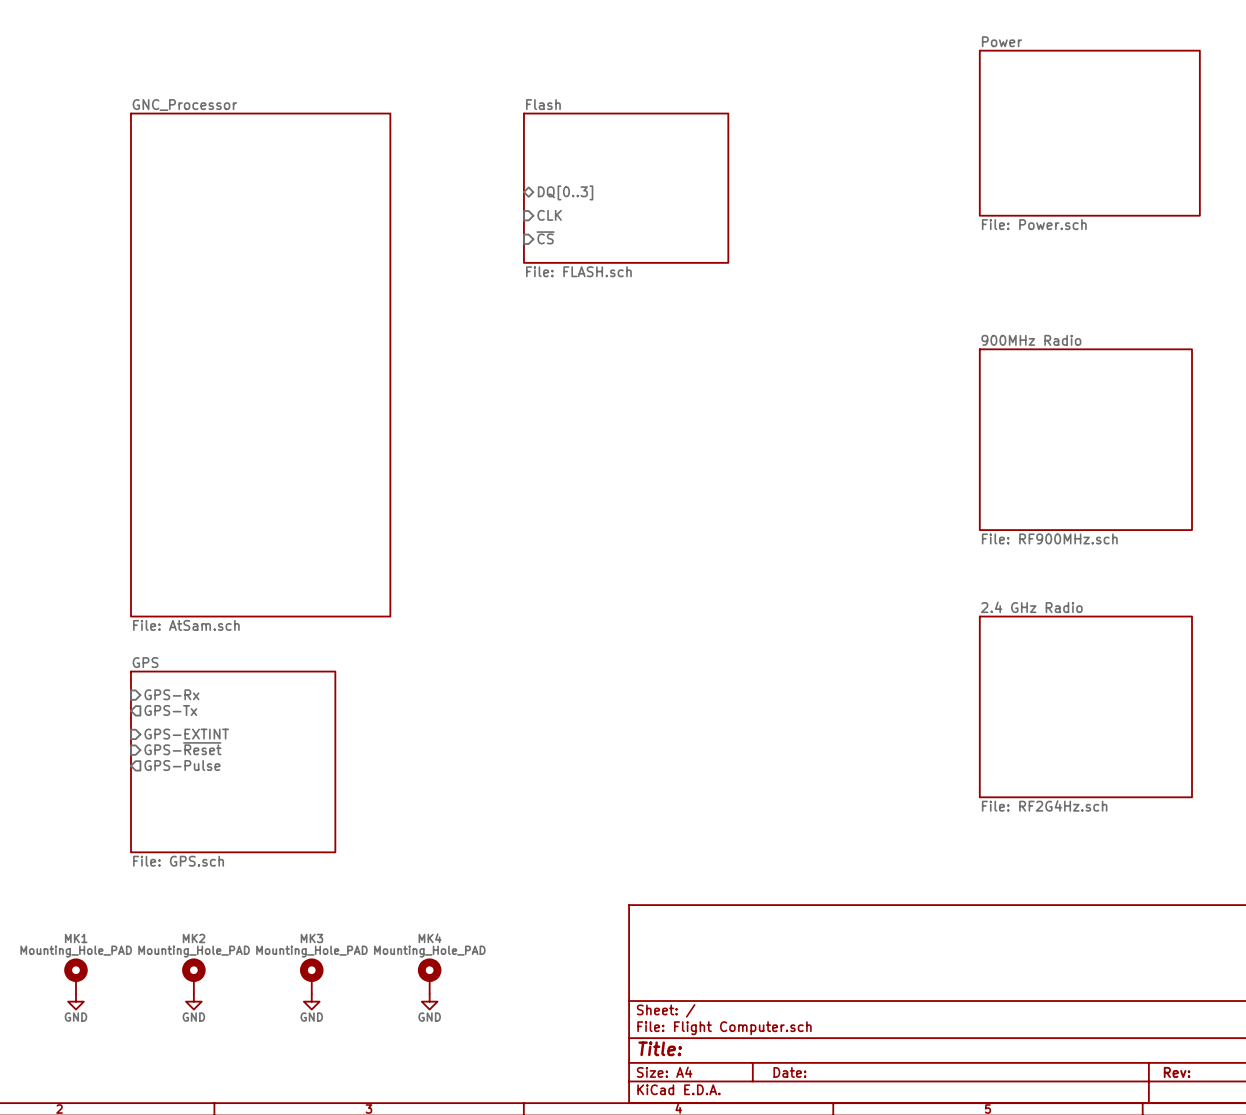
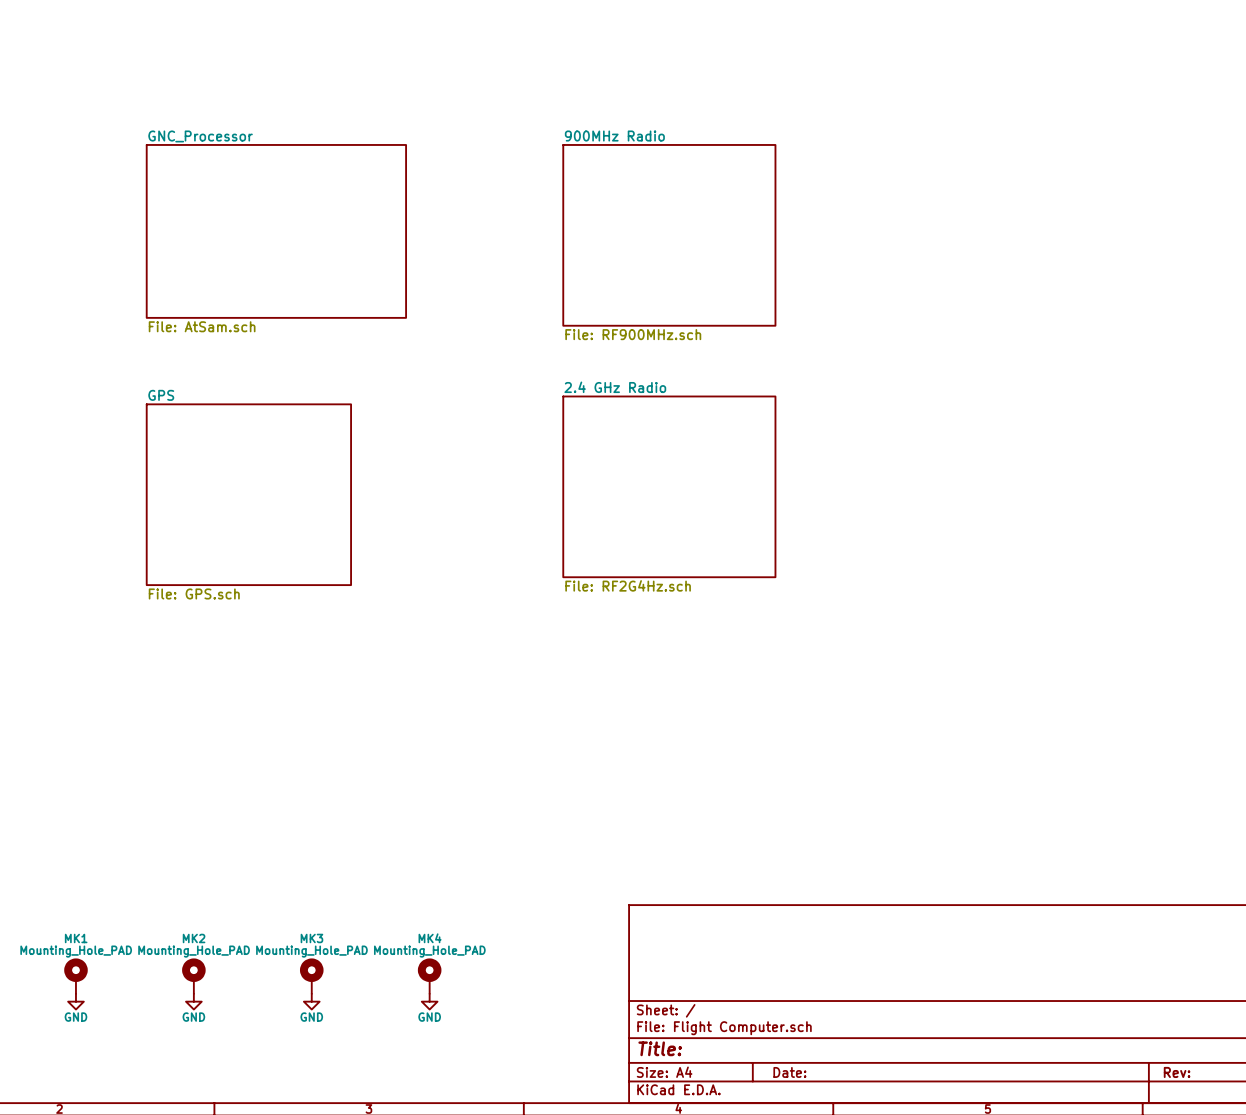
sheet Power: File: Power.sch (1089, 133) -> none
sheet Flash: File: FLASH.sch (626, 188) -> none
sheet pin: DQ[0..3] (565, 192) -> none
sheet pin: CLK (549, 215) -> none
sheet GNC_Processor: none -> File: AtSam.sch (276, 231)
sheet pin: ~{CS} (545, 237) -> none
sheet GNC_Processor: File: AtSam.sch (260, 365) -> none
sheet 900MHz Radio position: (1085, 439) -> (669, 235)
sheet GPS: none -> File: GPS.sch (248, 494)
sheet pin: GPS-Rx (171, 694) -> none
sheet 2.4 GHz Radio position: (1085, 706) -> (669, 486)
sheet pin: GPS-Tx (170, 710) -> none
sheet pin: GPS-EXTINT (186, 734) -> none
sheet pin: GPS-~{Reset} (182, 748) -> none
sheet GPS: File: GPS.sch (233, 761) -> none
sheet pin: GPS-Pulse (182, 765) -> none

